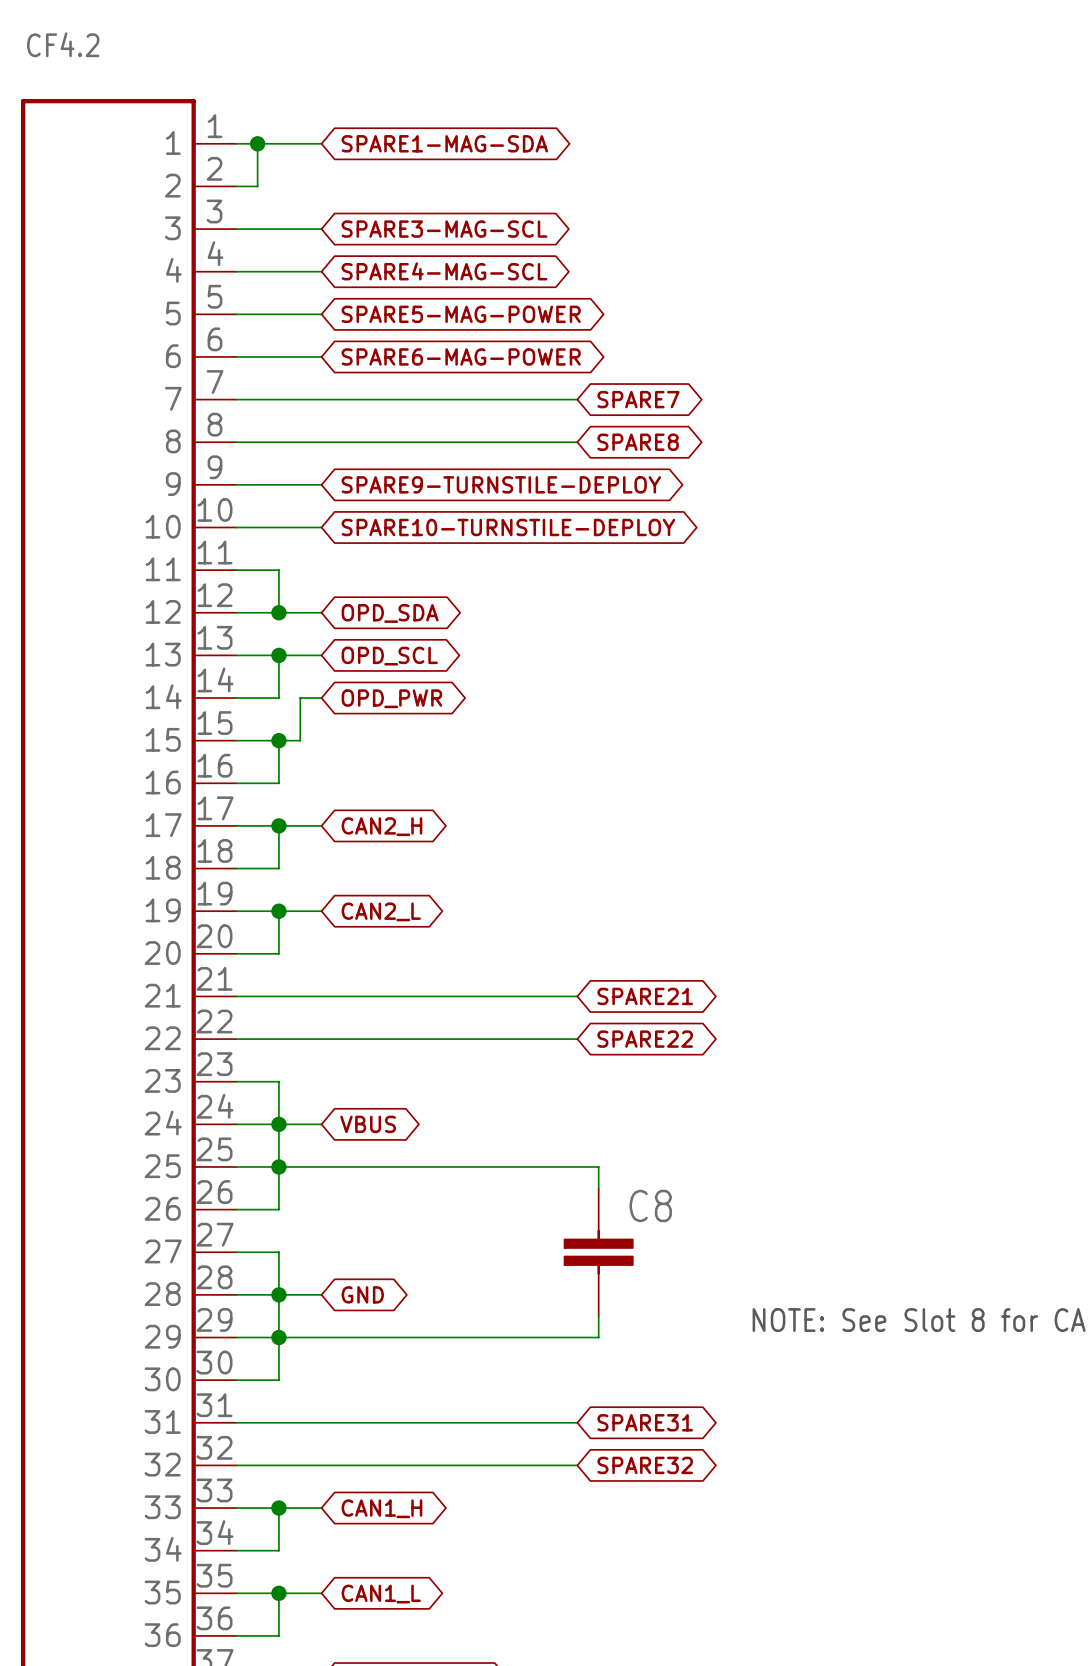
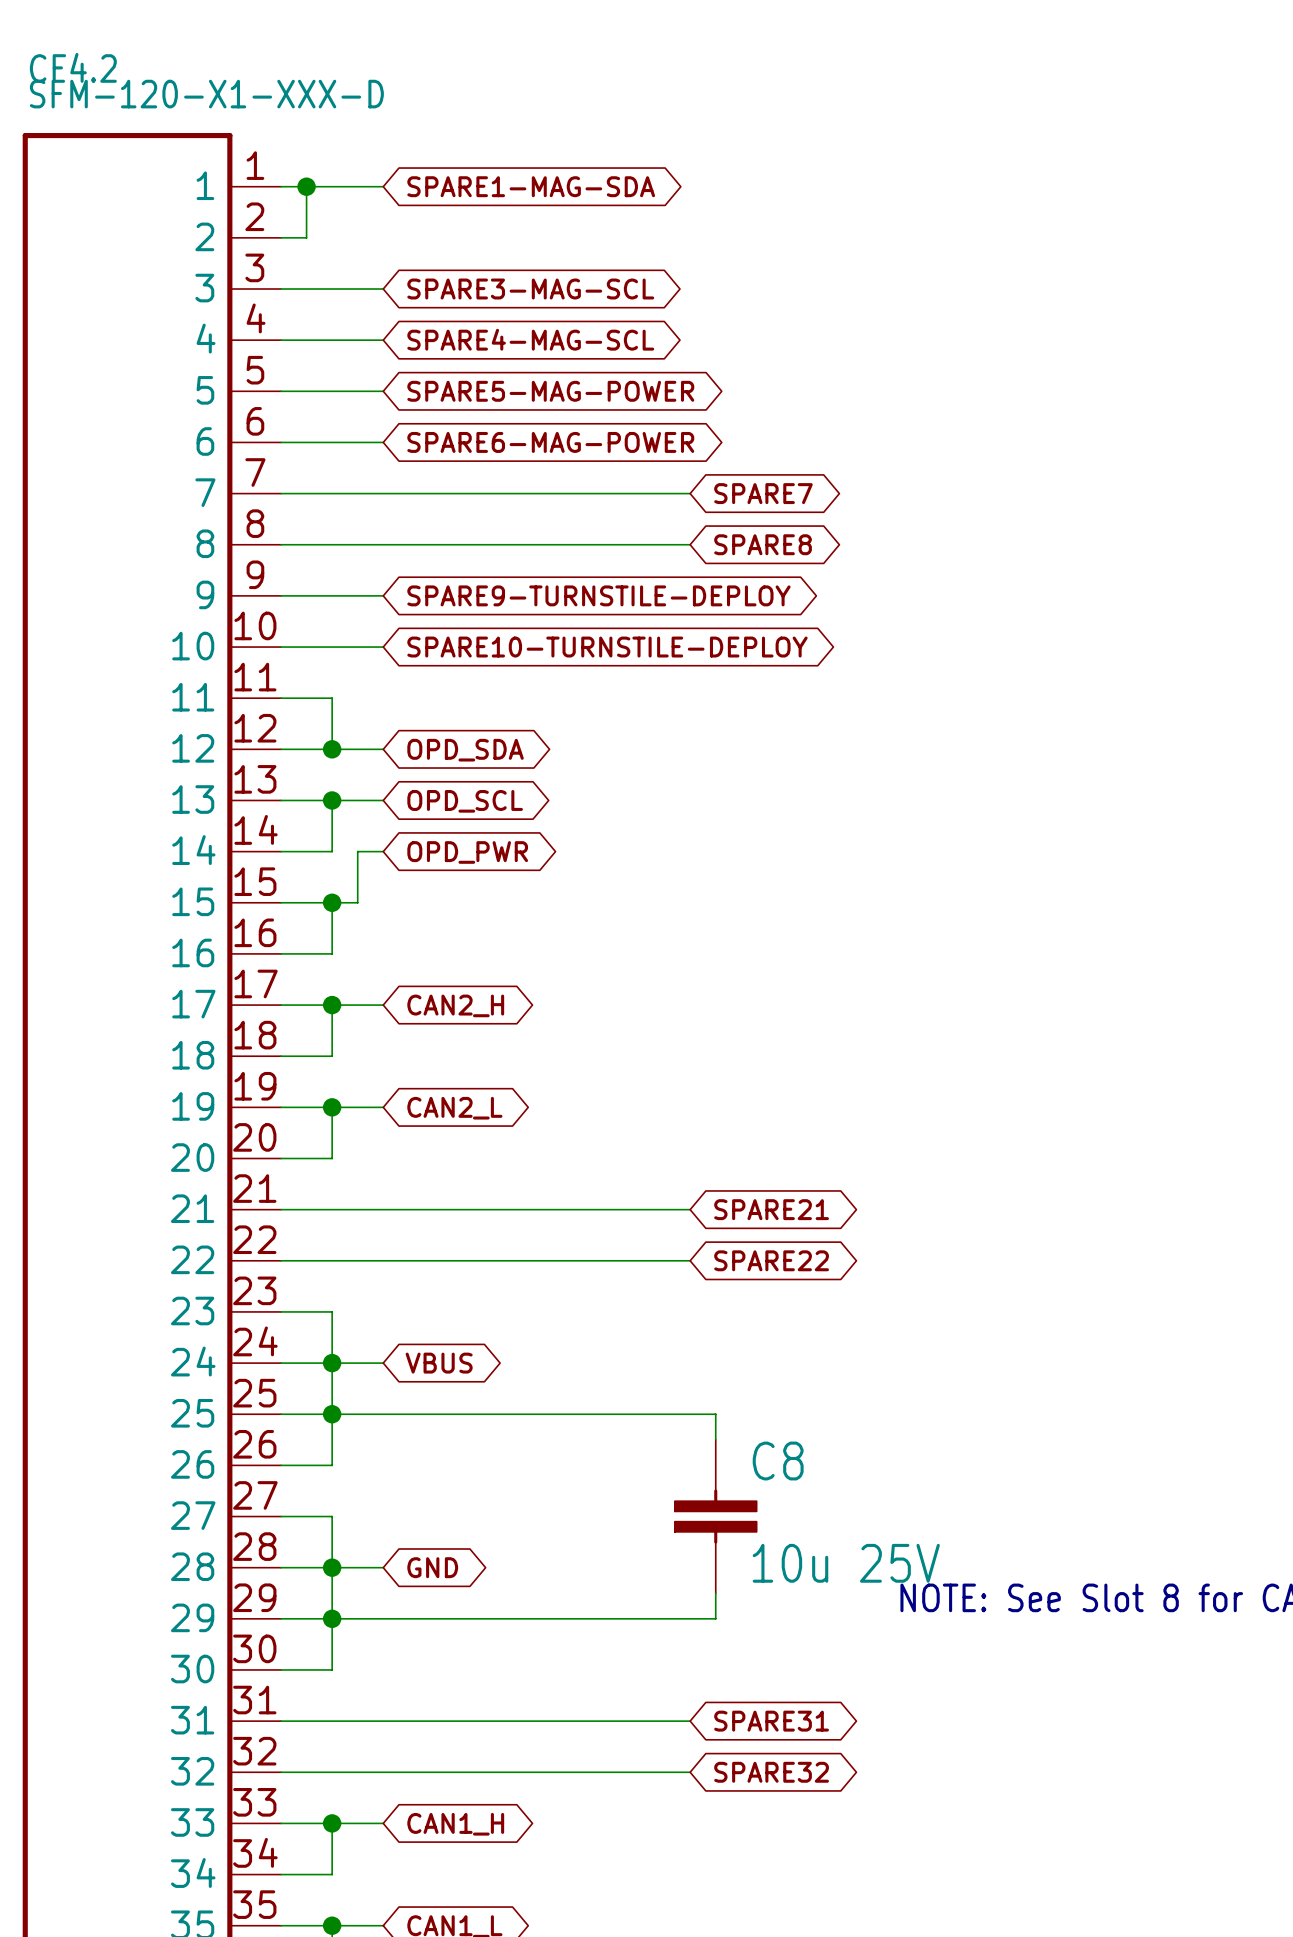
CF4.2 value: none -> SFM-120-X1-XXX-D (206, 94)
C8 value: none -> 10u 25V (846, 1563)

